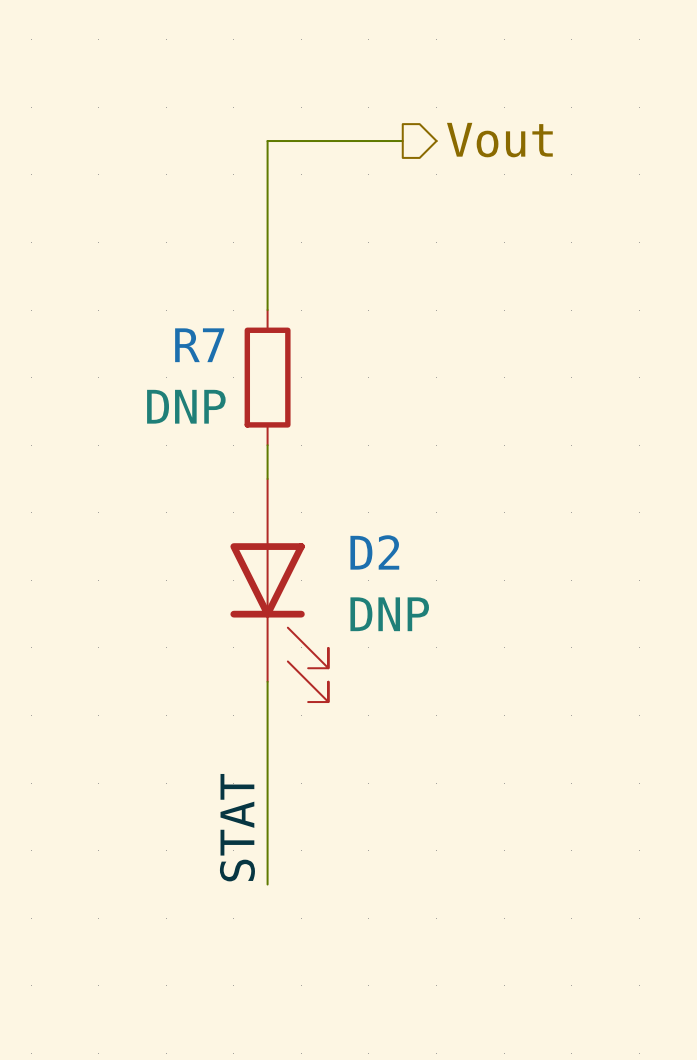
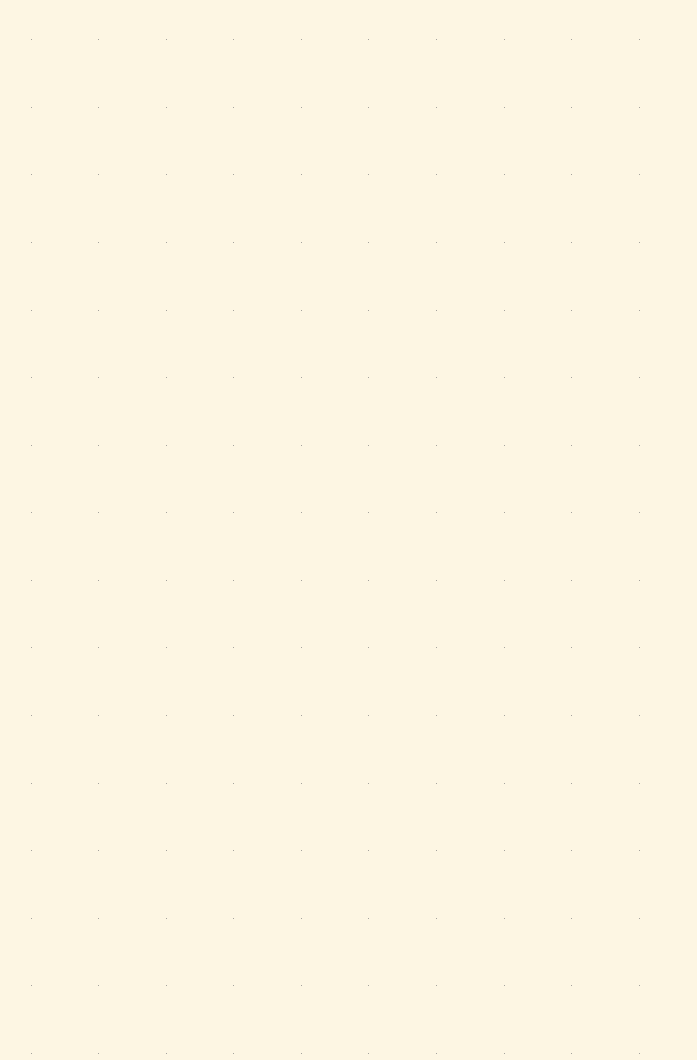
hierarchical label: Vout (499, 140) -> none
wire: (402, 141) (267, 141) (267, 310) -> none
R7: DNP (267, 377) -> none
wire: (267, 445) (267, 478) -> none
D2: DNP (279, 590) -> none
wire: (267, 681) (267, 884) -> none
label: STAT (237, 827) -> none

